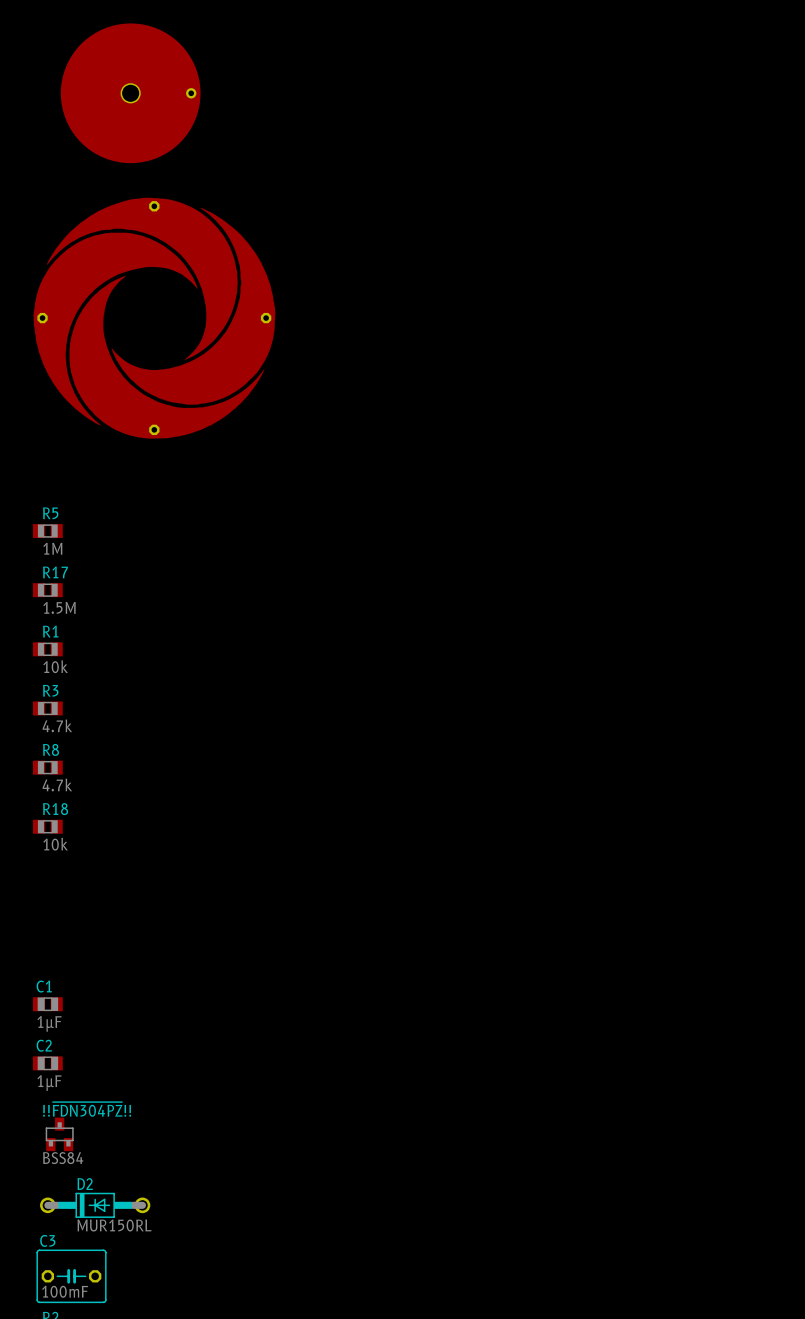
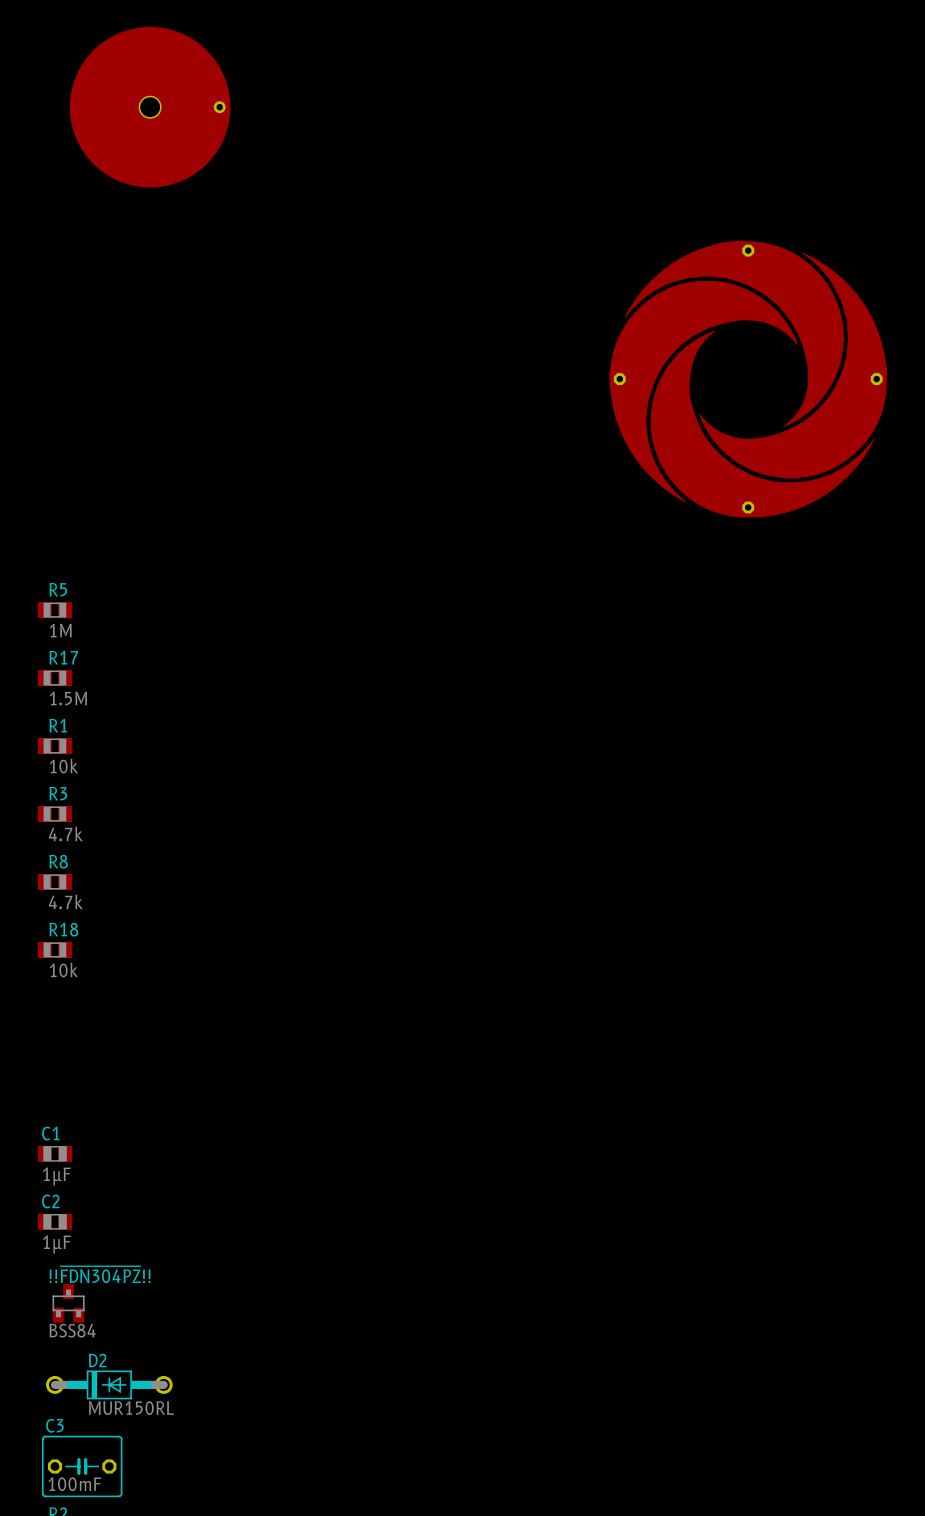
part: (154, 318) -> none
part: none -> (748, 379)

